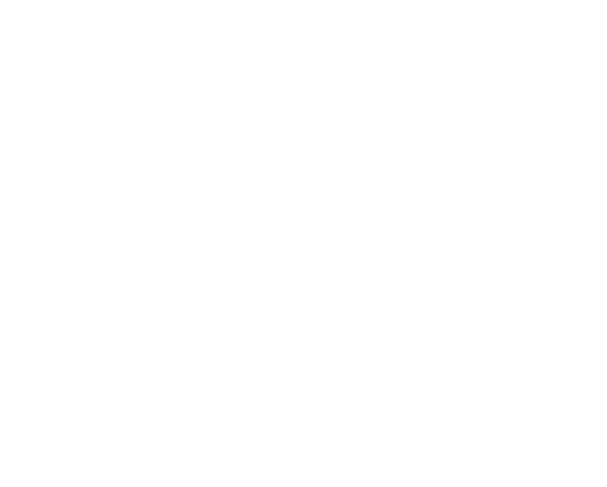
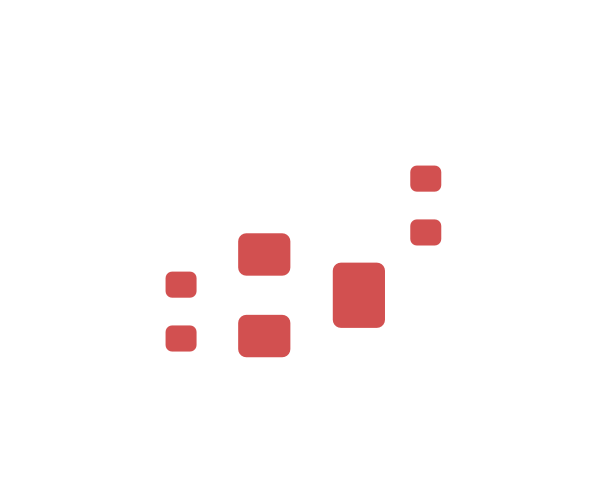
part: none -> (425, 205)
part: none -> (311, 295)
part: none -> (181, 311)

